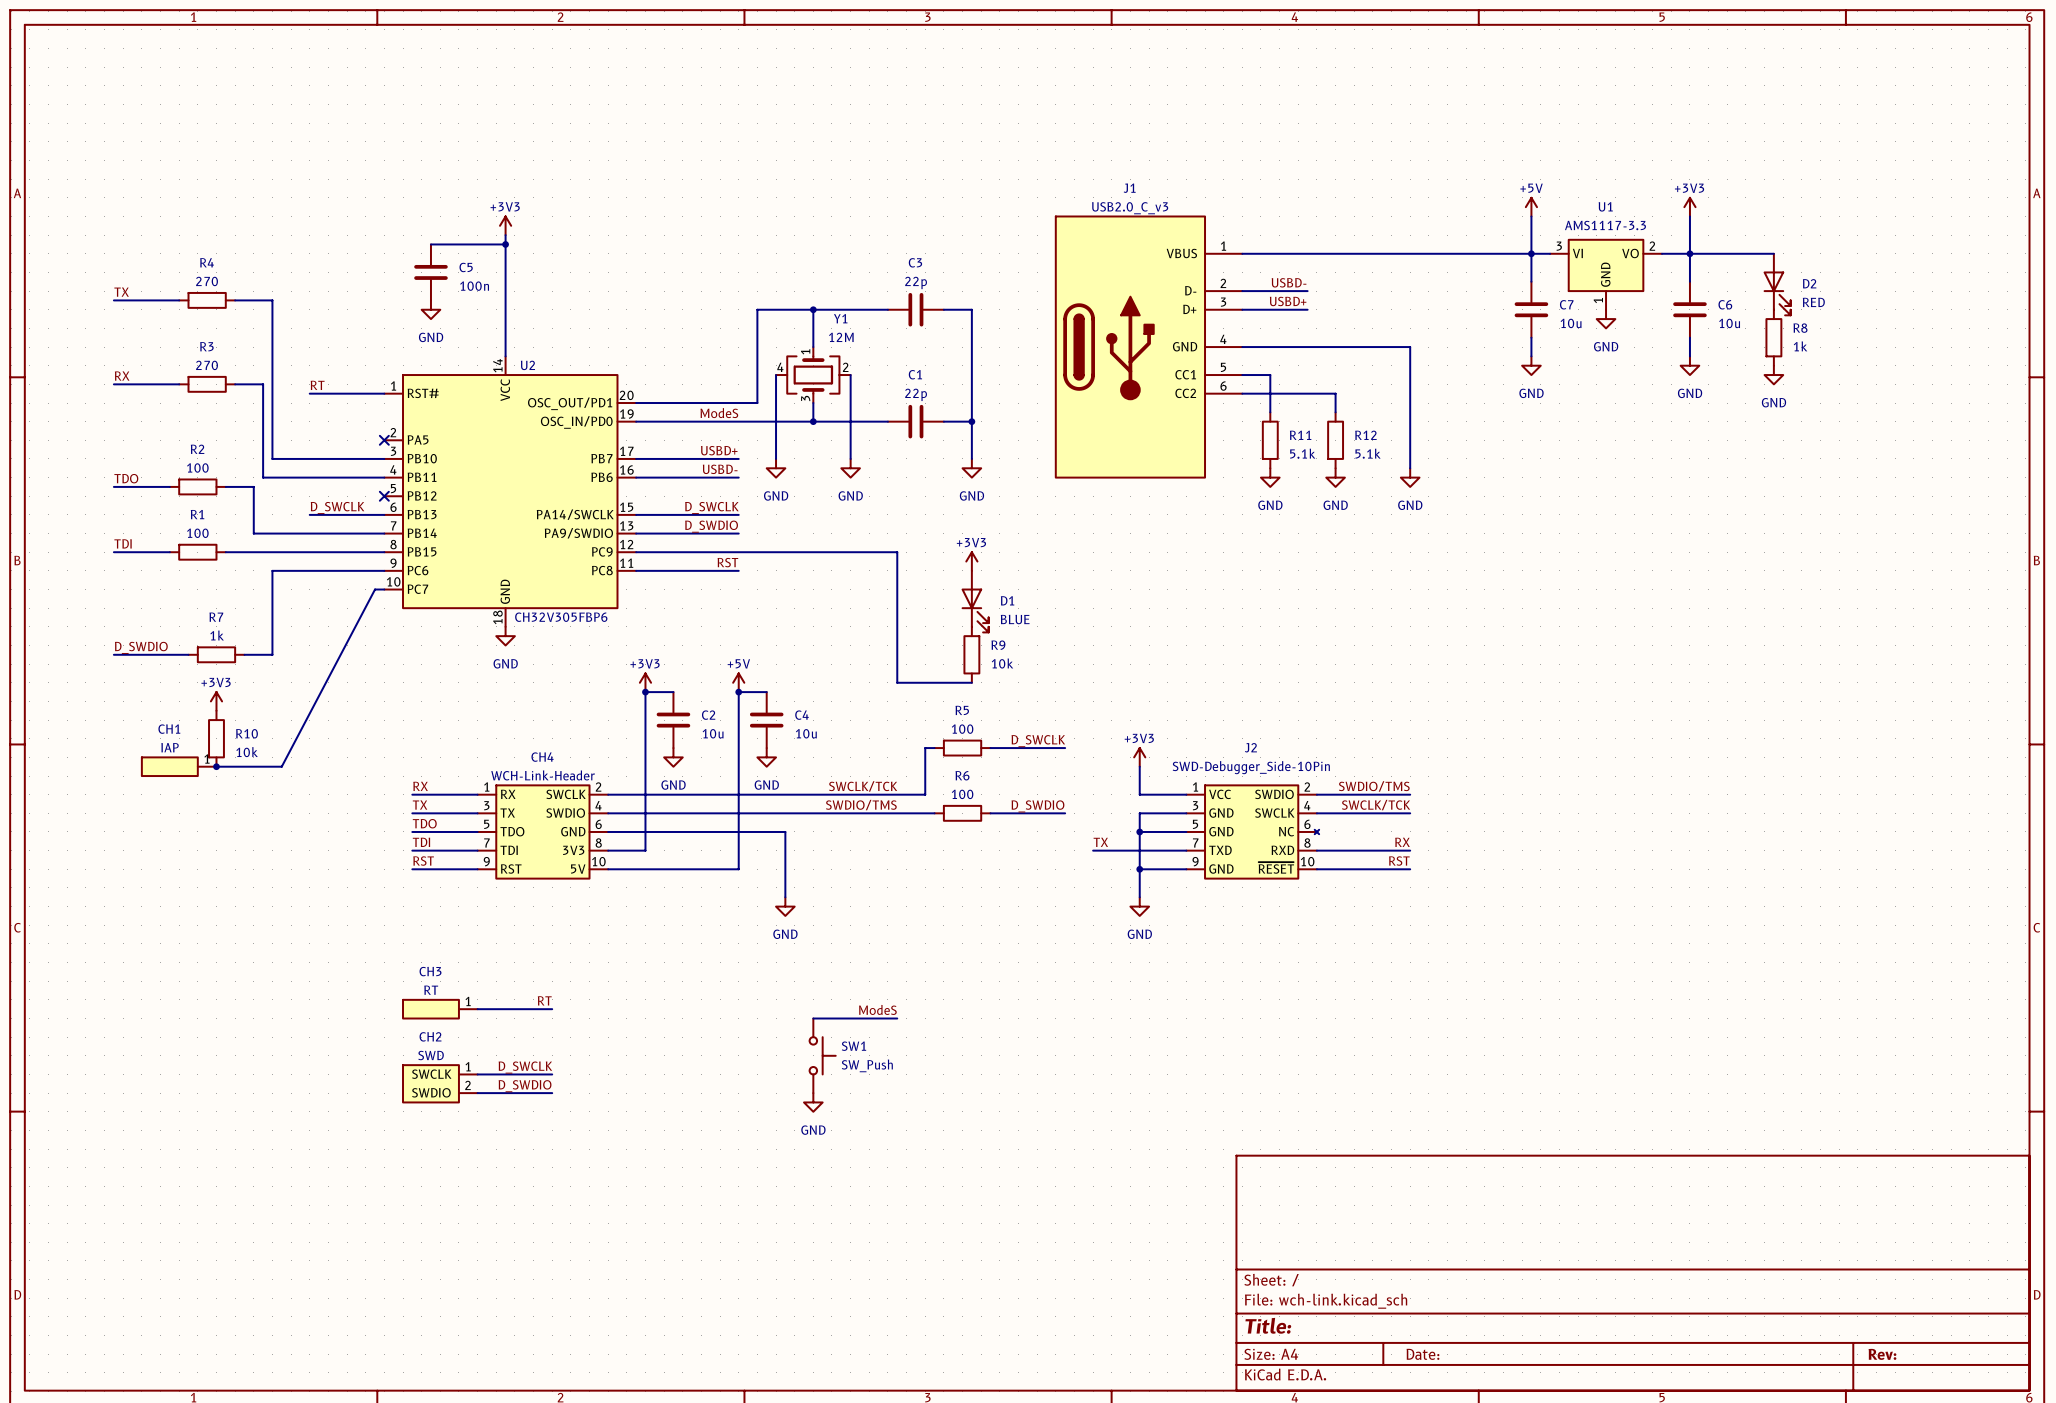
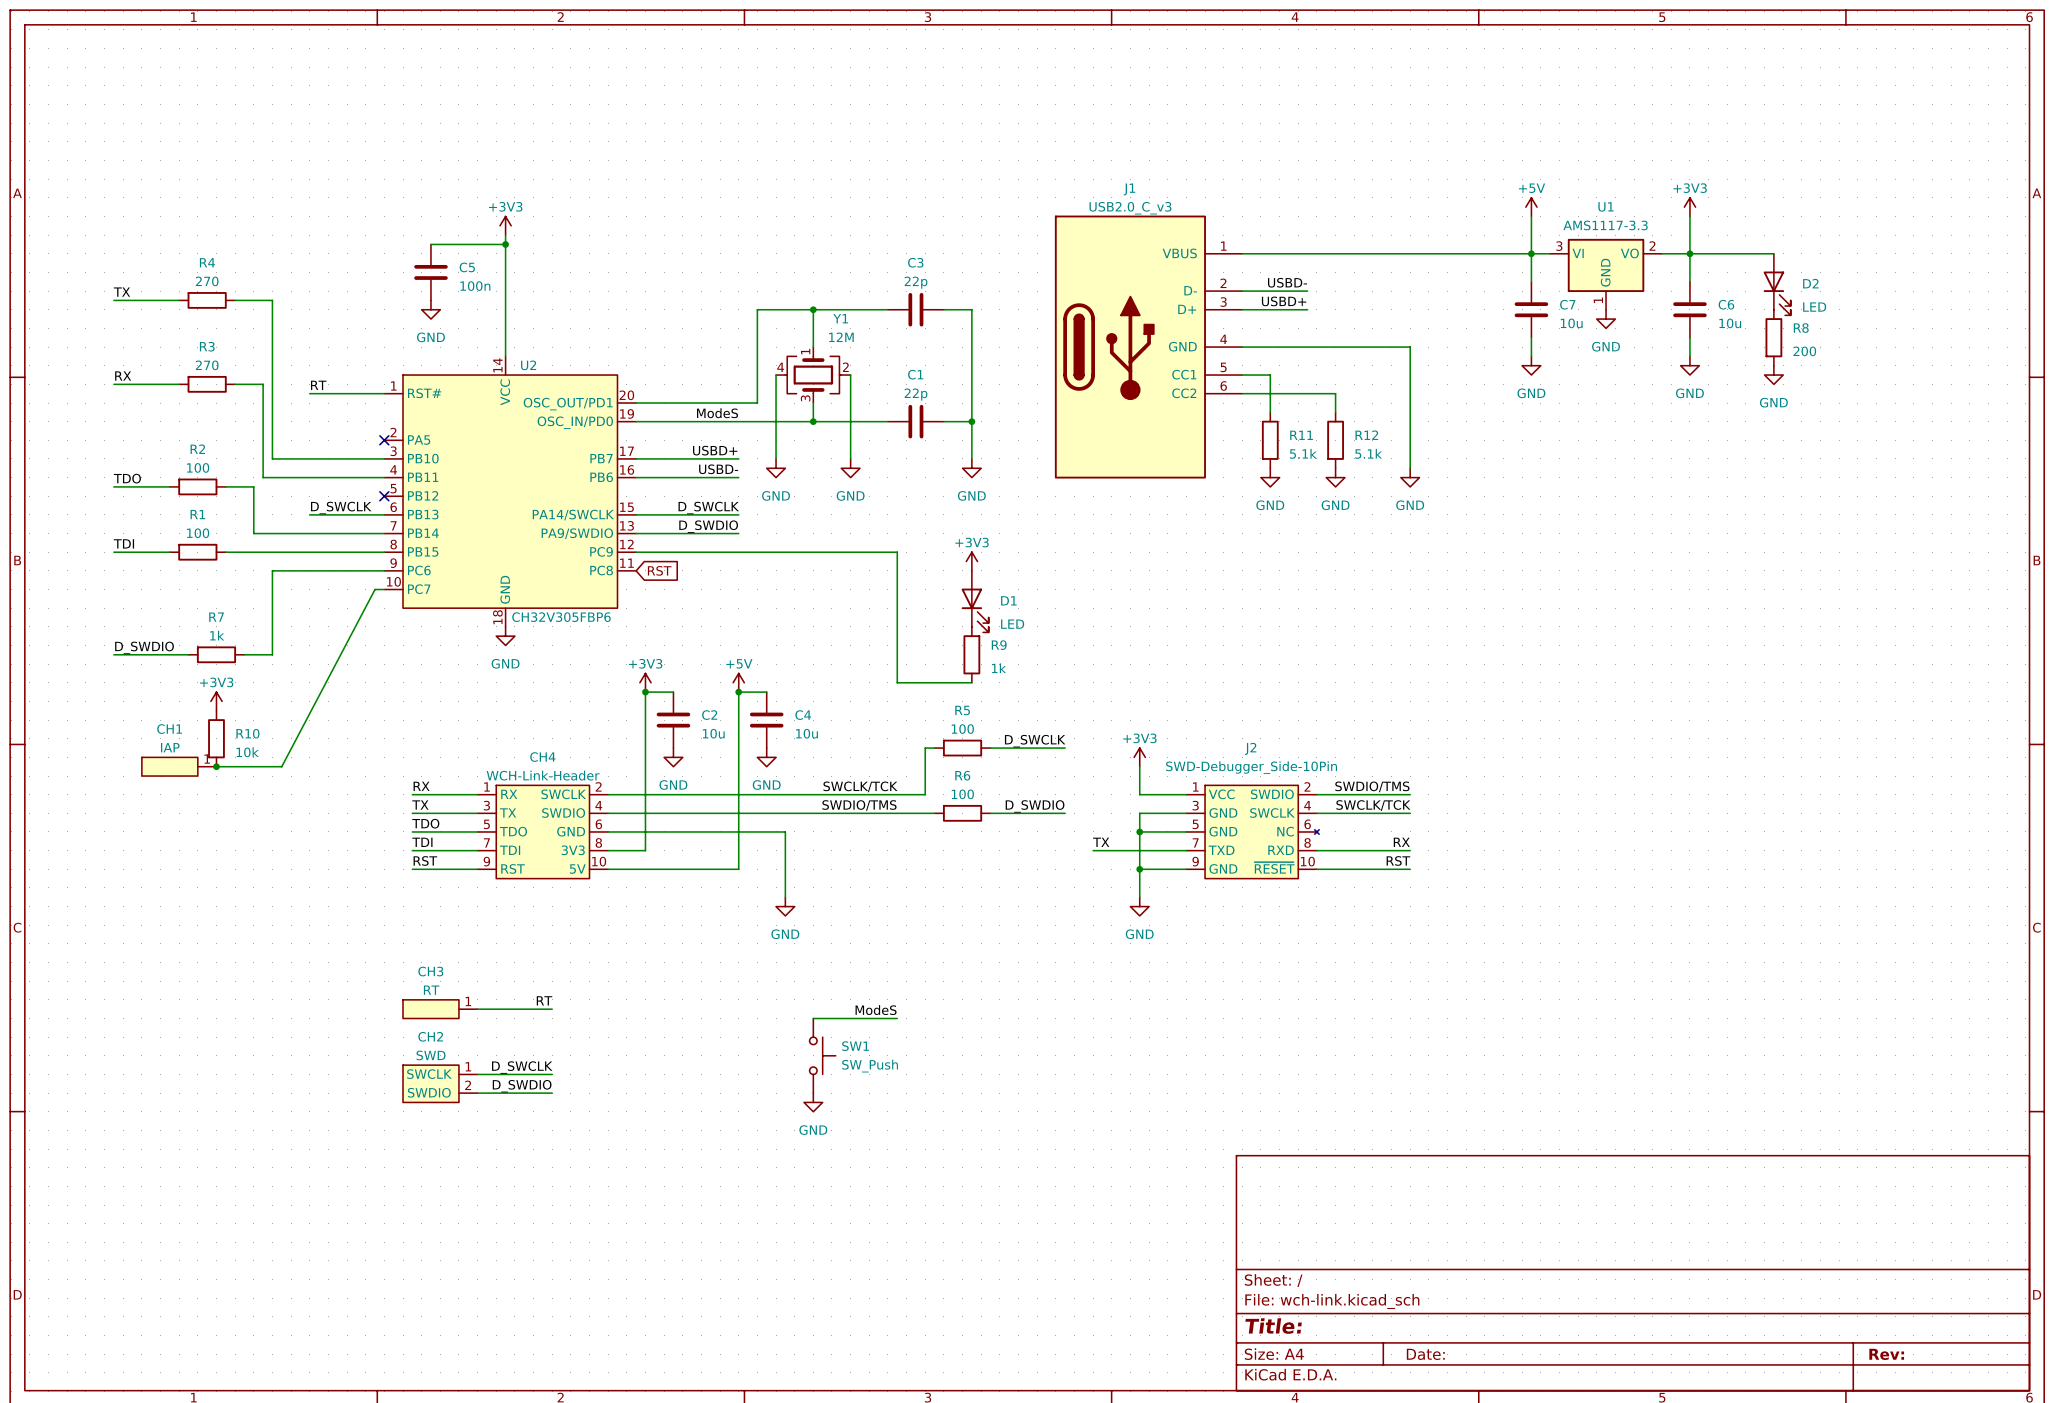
D2 value: RED (1813, 302) -> LED (1814, 307)
R8 value: 1k (1800, 346) -> 200 (1804, 351)
label: RST (727, 562) -> none
wire: (636, 570) (738, 570) -> none
global label: none -> RST (659, 570)
D1 value: BLUE (1015, 619) -> LED (1012, 624)
R9 value: 10k (1002, 663) -> 1k (998, 668)

